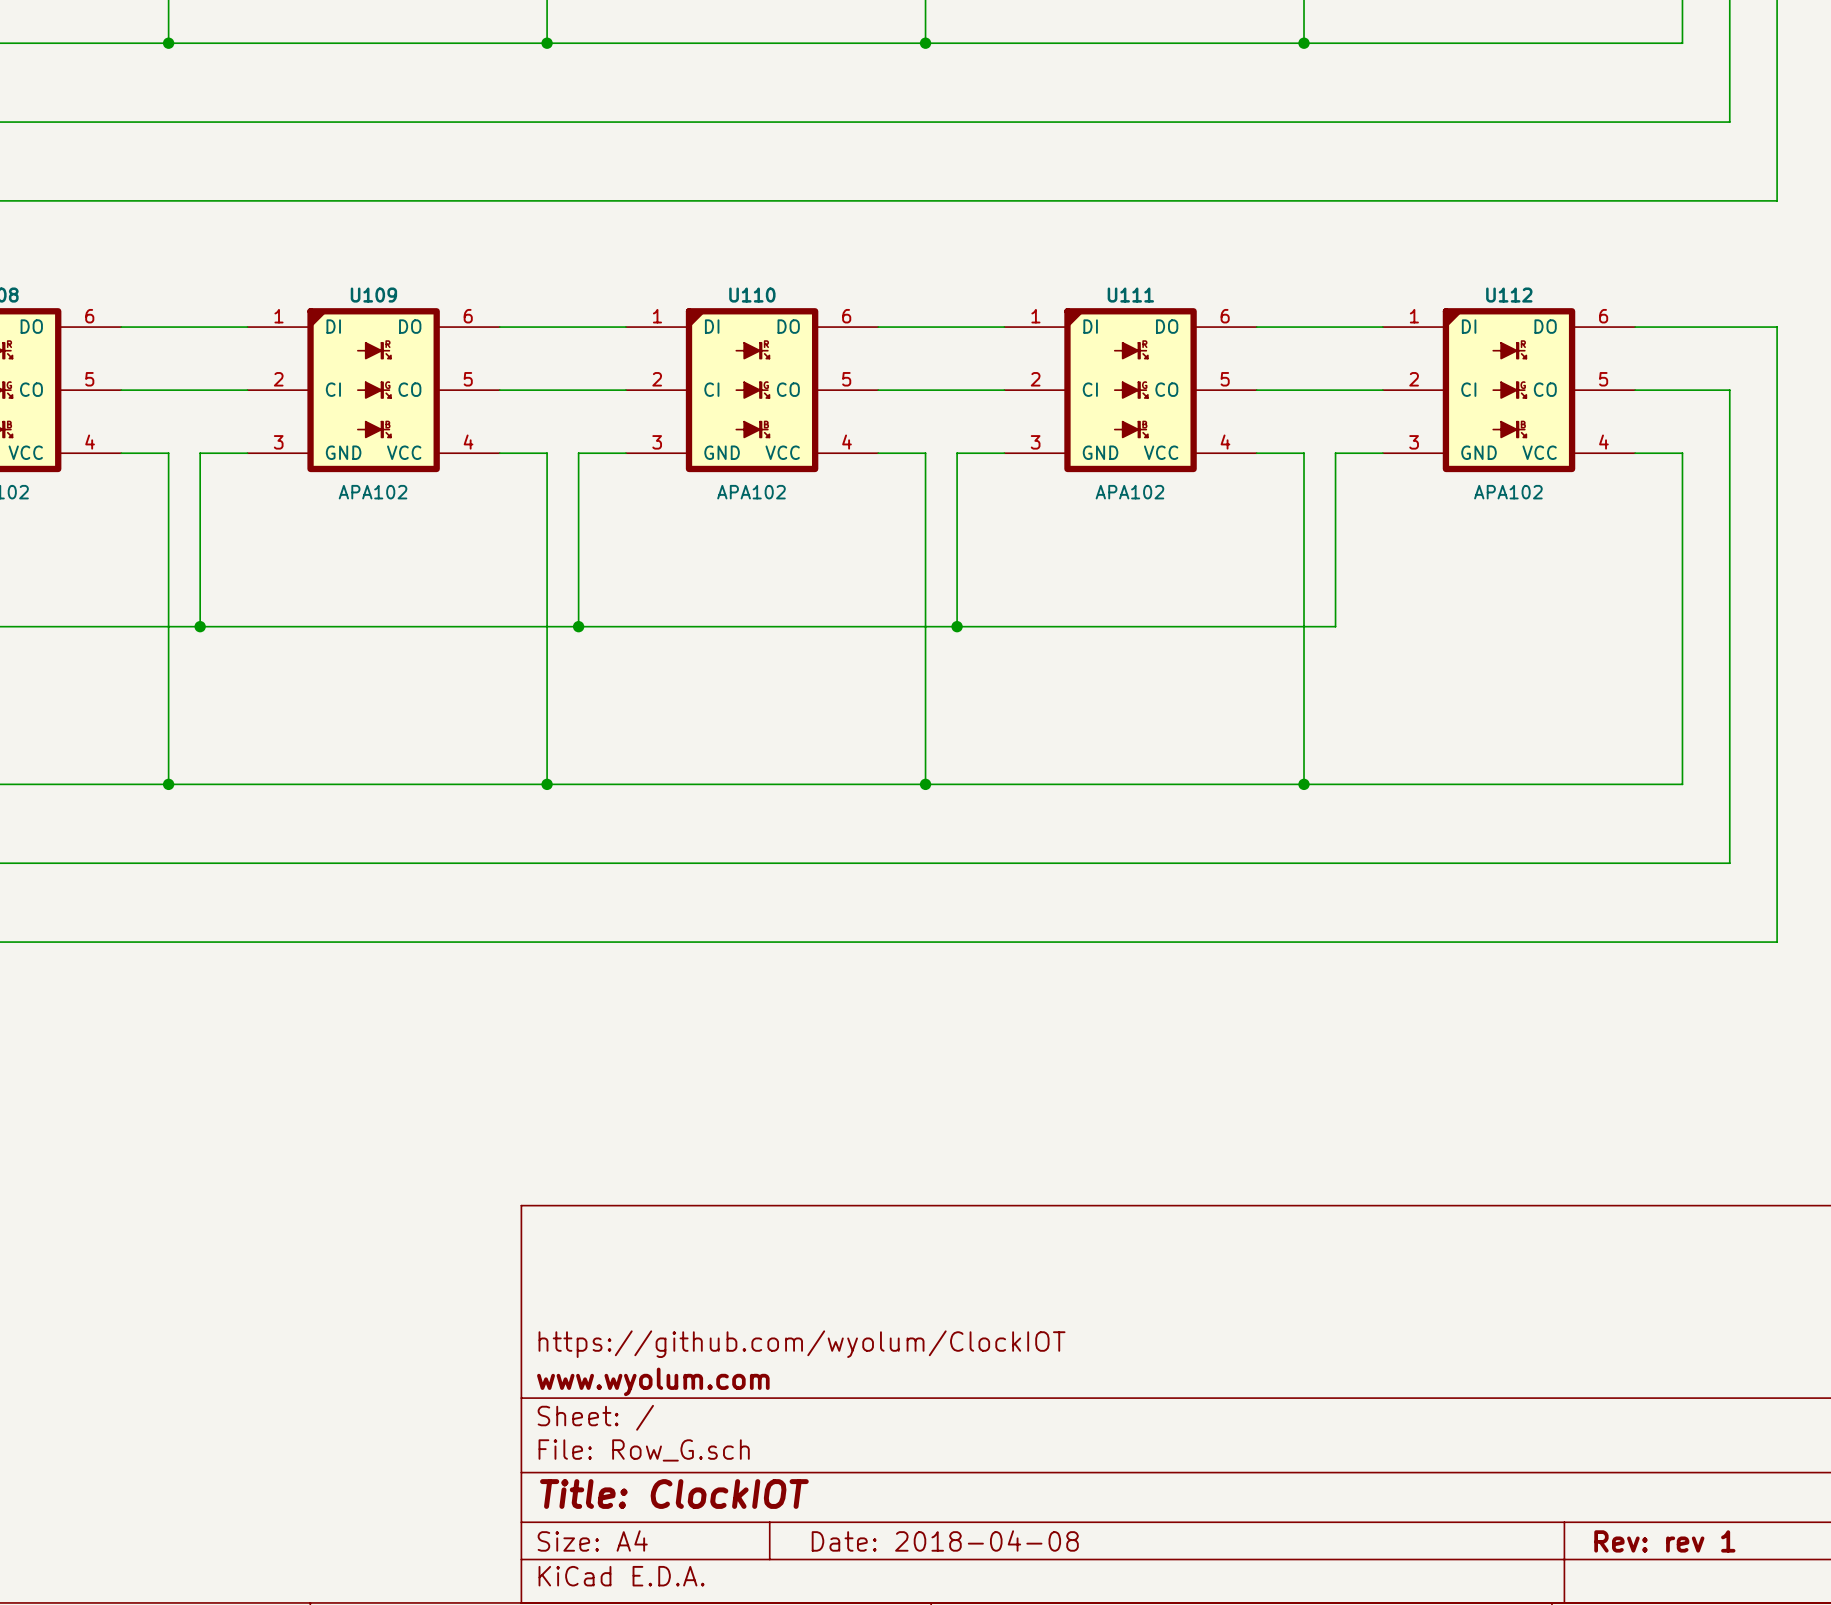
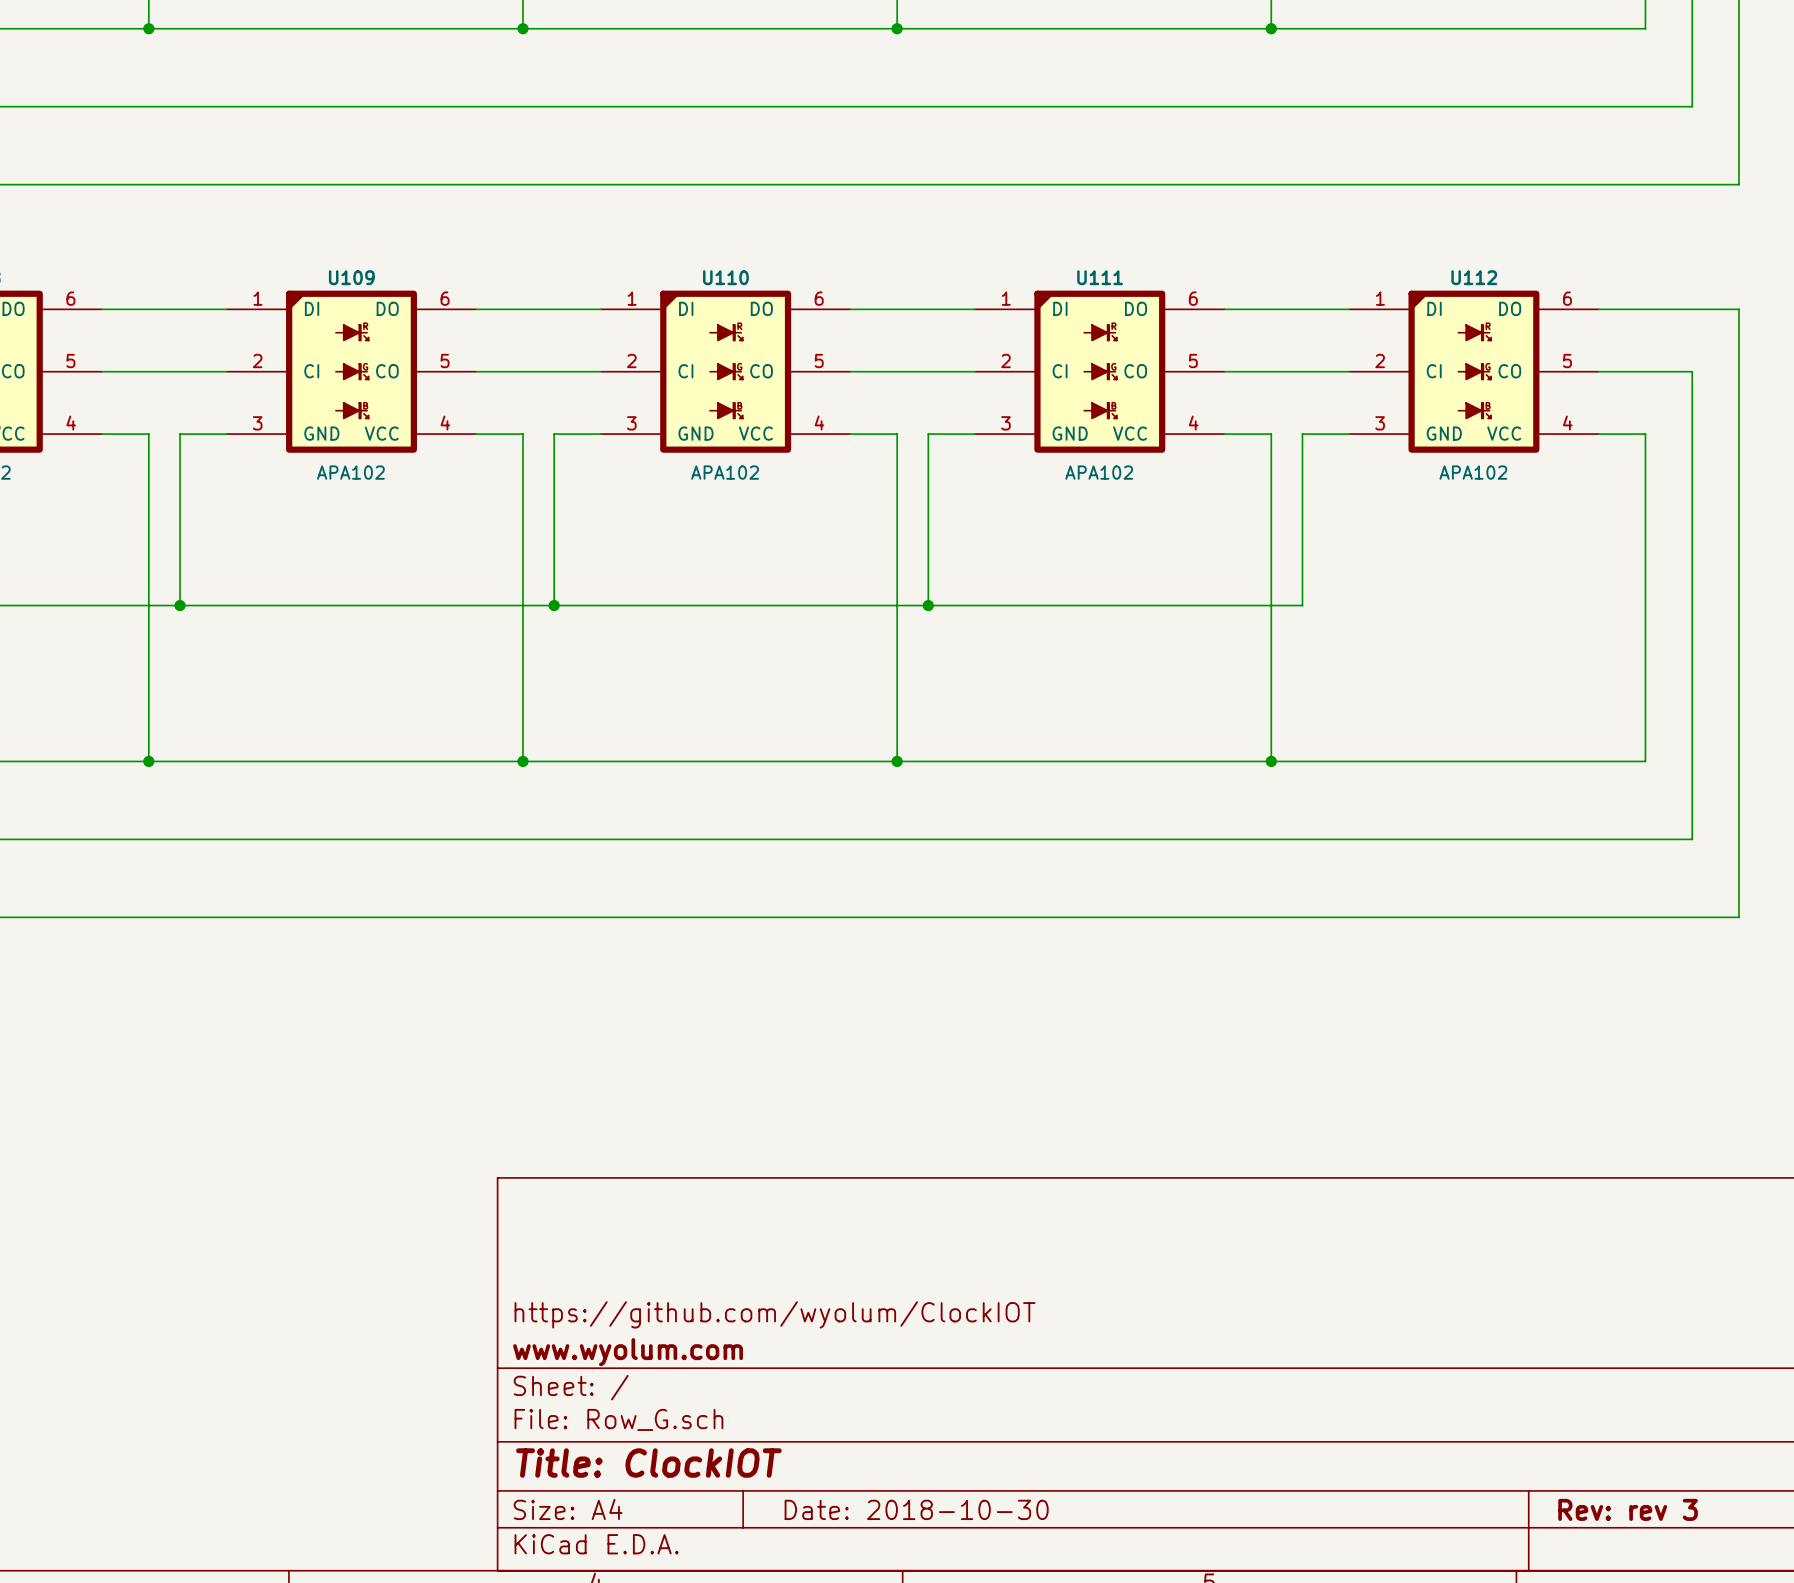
title block: Date: 2018-04-08 (945, 1540) -> Date: 2018-10-30 (916, 1509)
title block: Rev: rev 1 (1664, 1541) -> Rev: rev 3 (1628, 1509)

